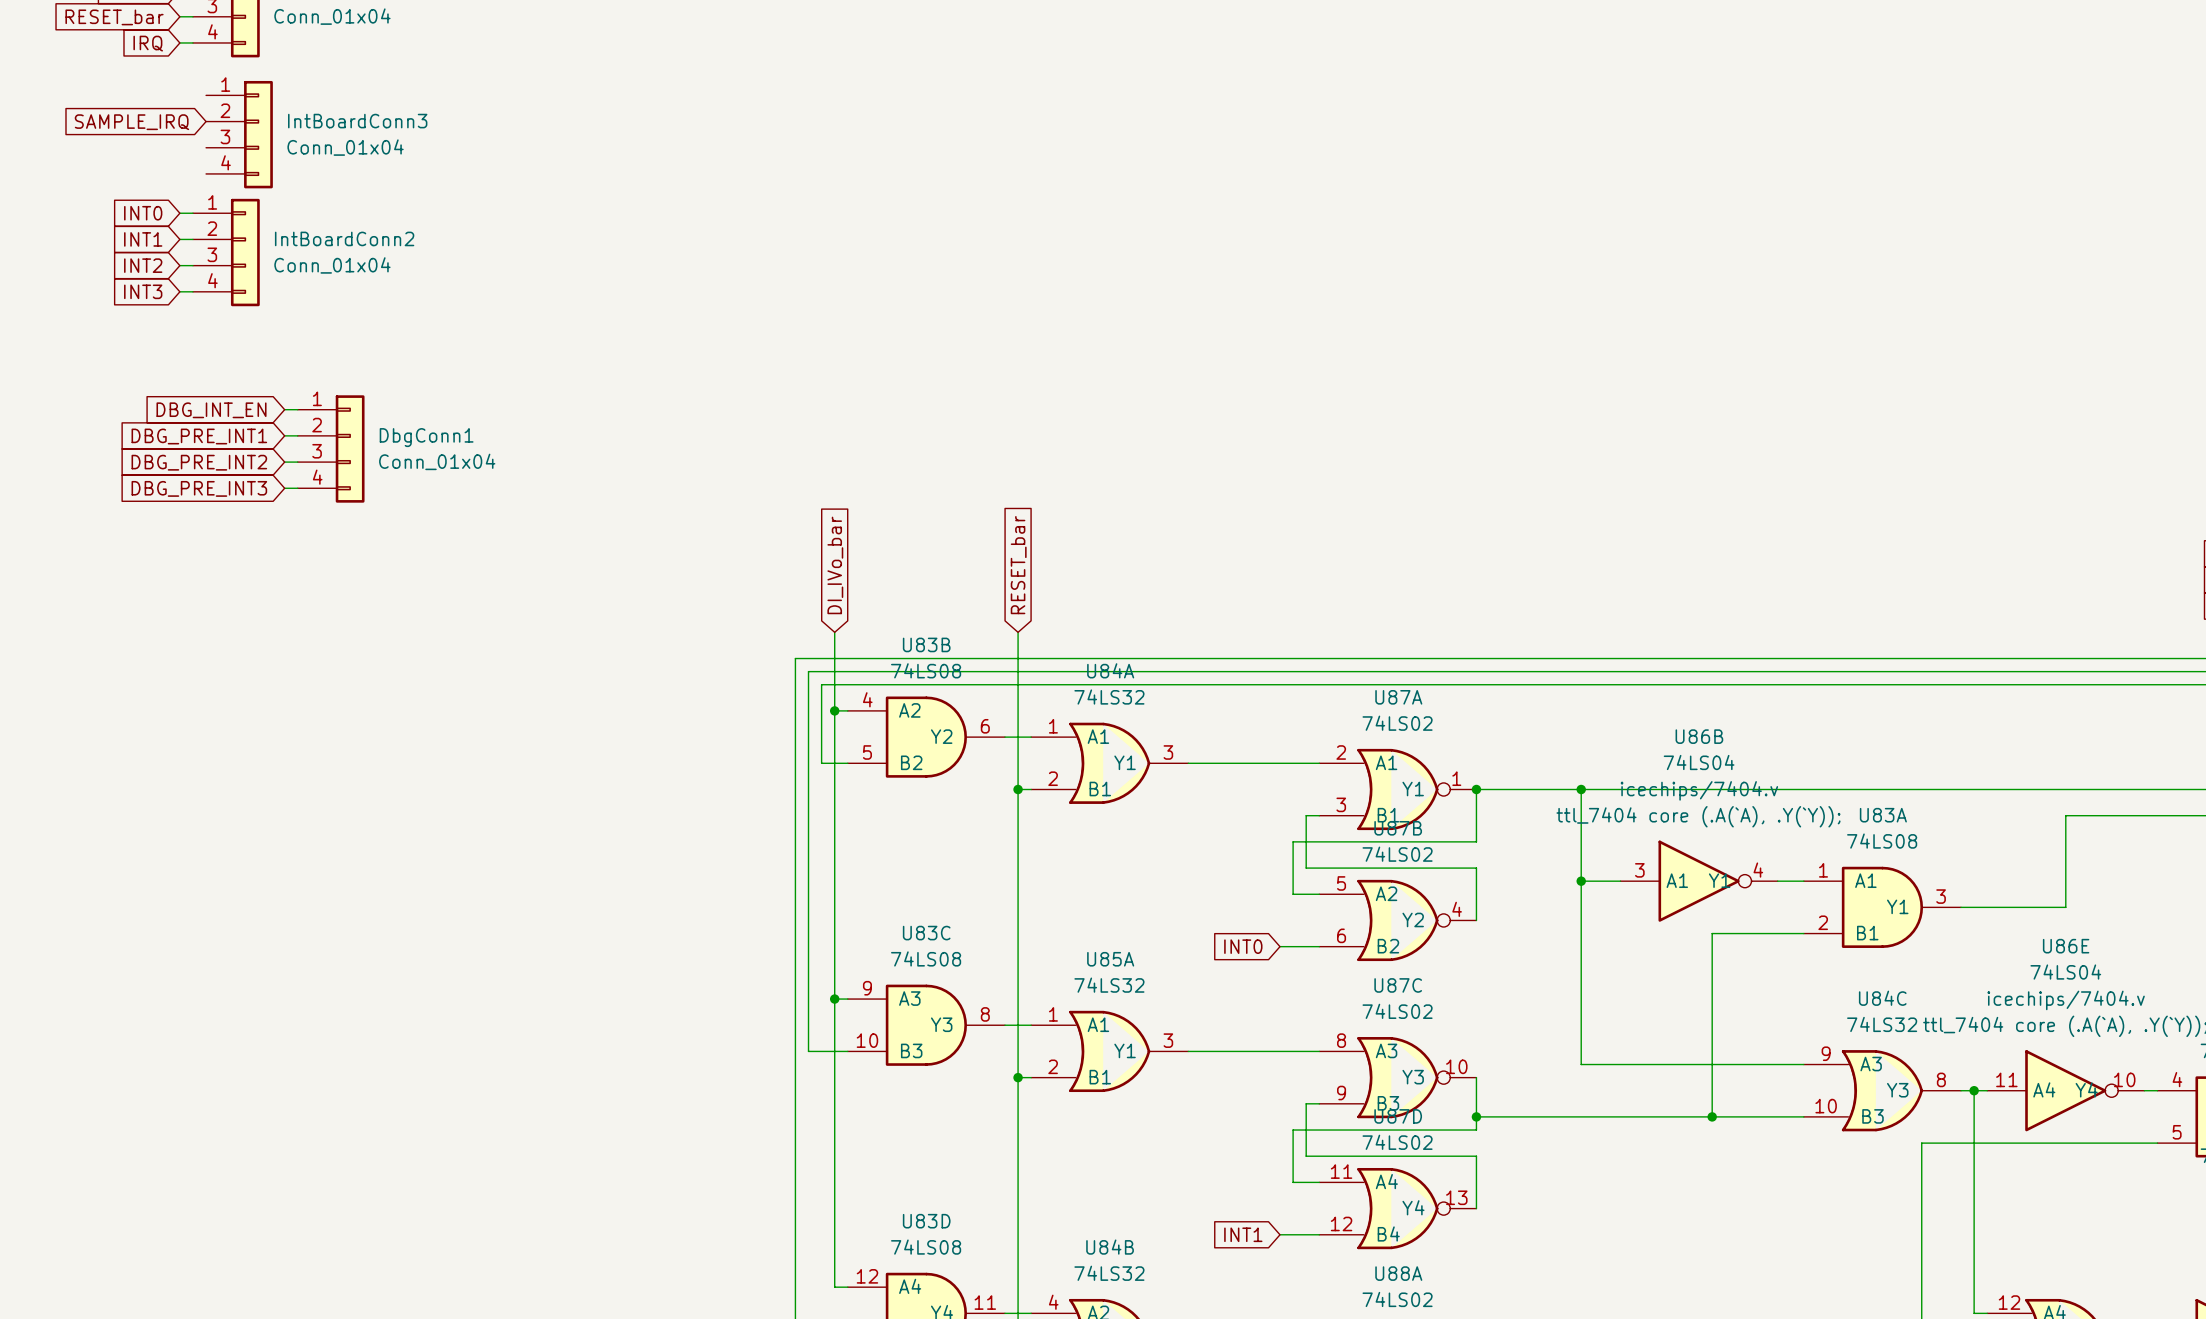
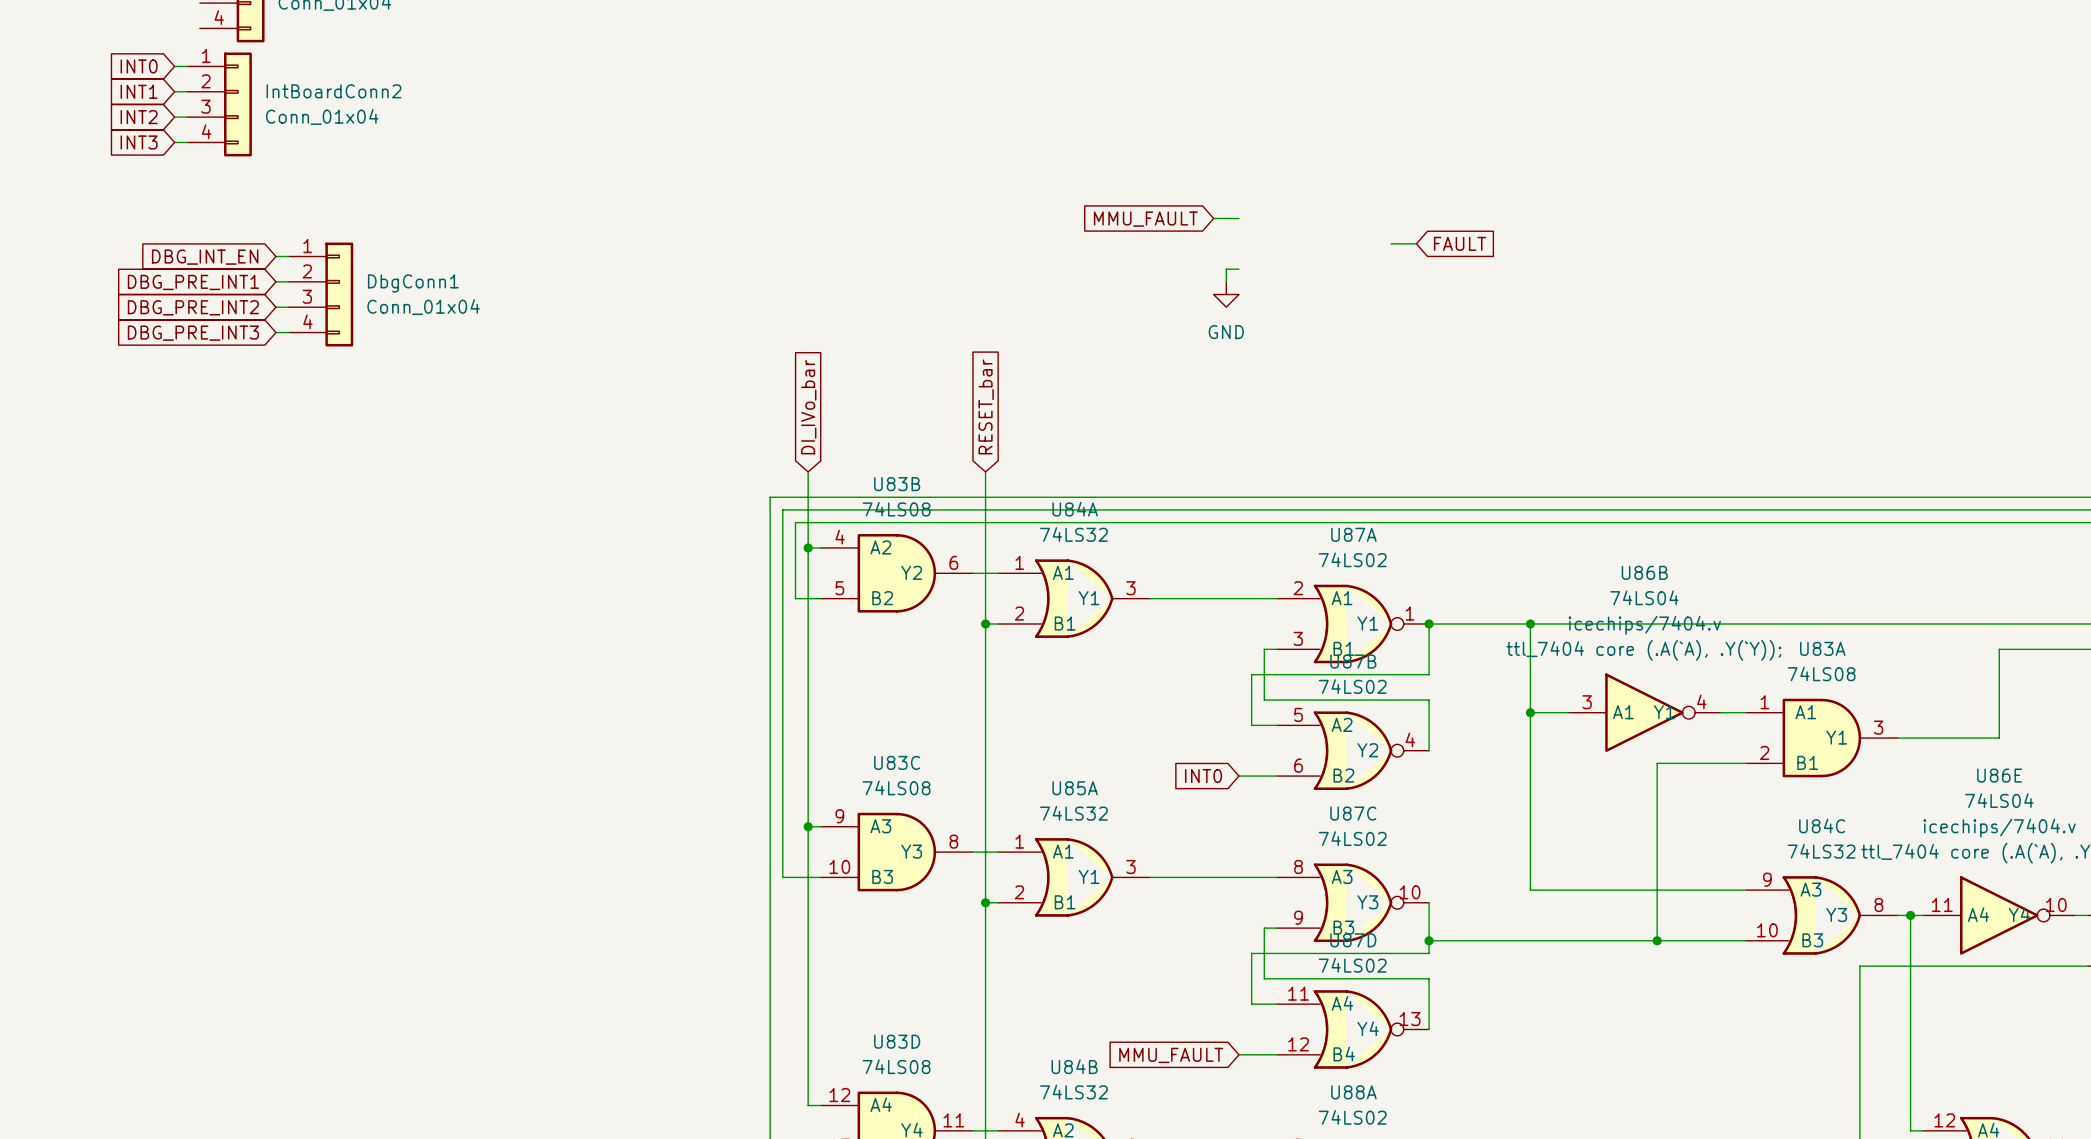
wire: none -> (1213, 218) (1238, 218)
global label: none -> MMU_FAULT (1145, 219)
wire: none -> (1391, 243) (1416, 243)
global label: none -> FAULT (1460, 243)
wire: none -> (1238, 269) (1226, 269) (1226, 281)
power symbol: none -> GND (1226, 294)
global label: INT1 (1243, 1234) -> MMU_FAULT (1171, 1055)

